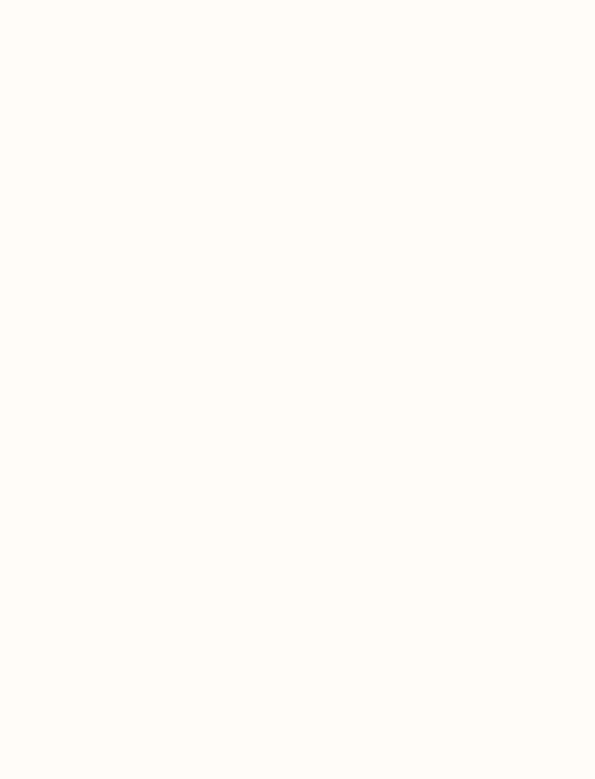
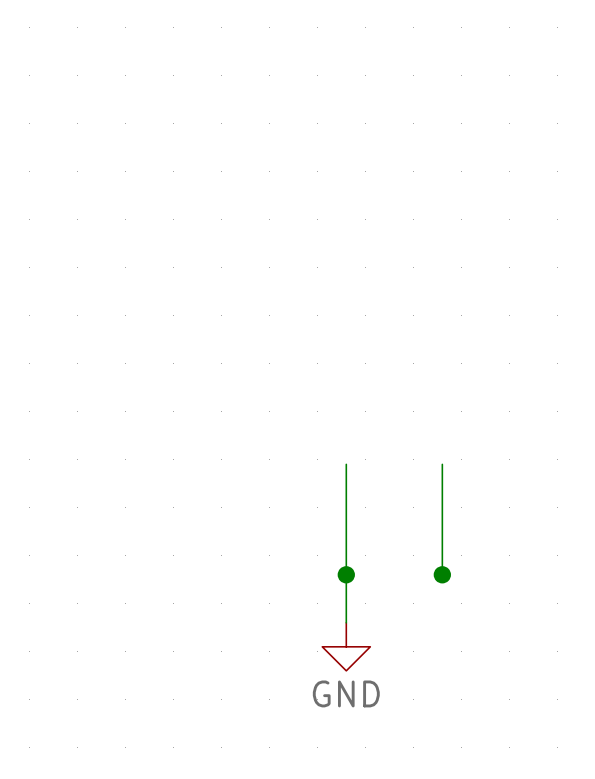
wire: none -> (346, 464) (346, 622)
wire: none -> (442, 464) (442, 574)
junction: none -> (346, 574)
junction: none -> (442, 574)
power symbol: none -> GND (346, 646)

